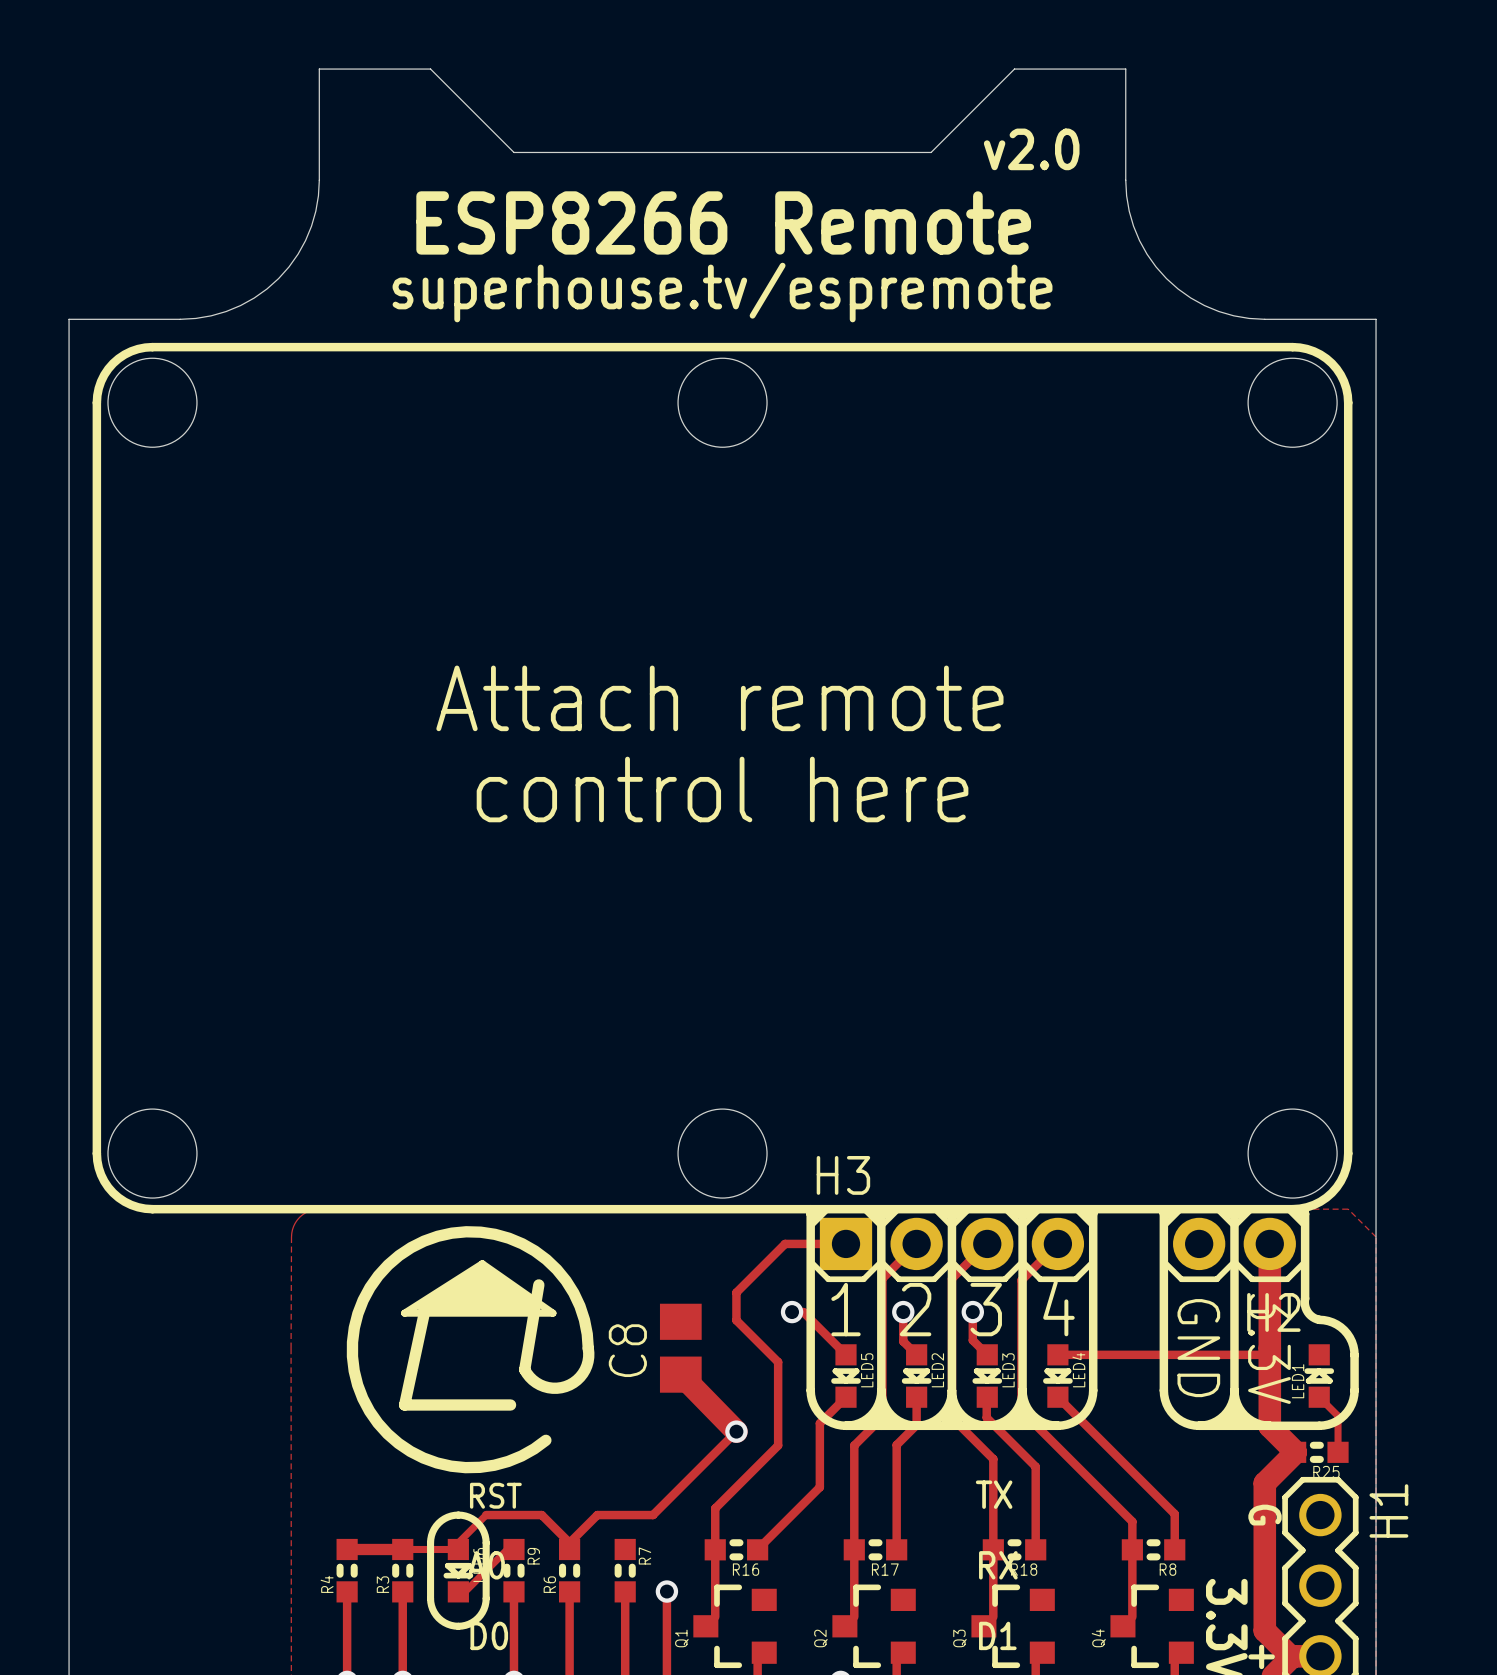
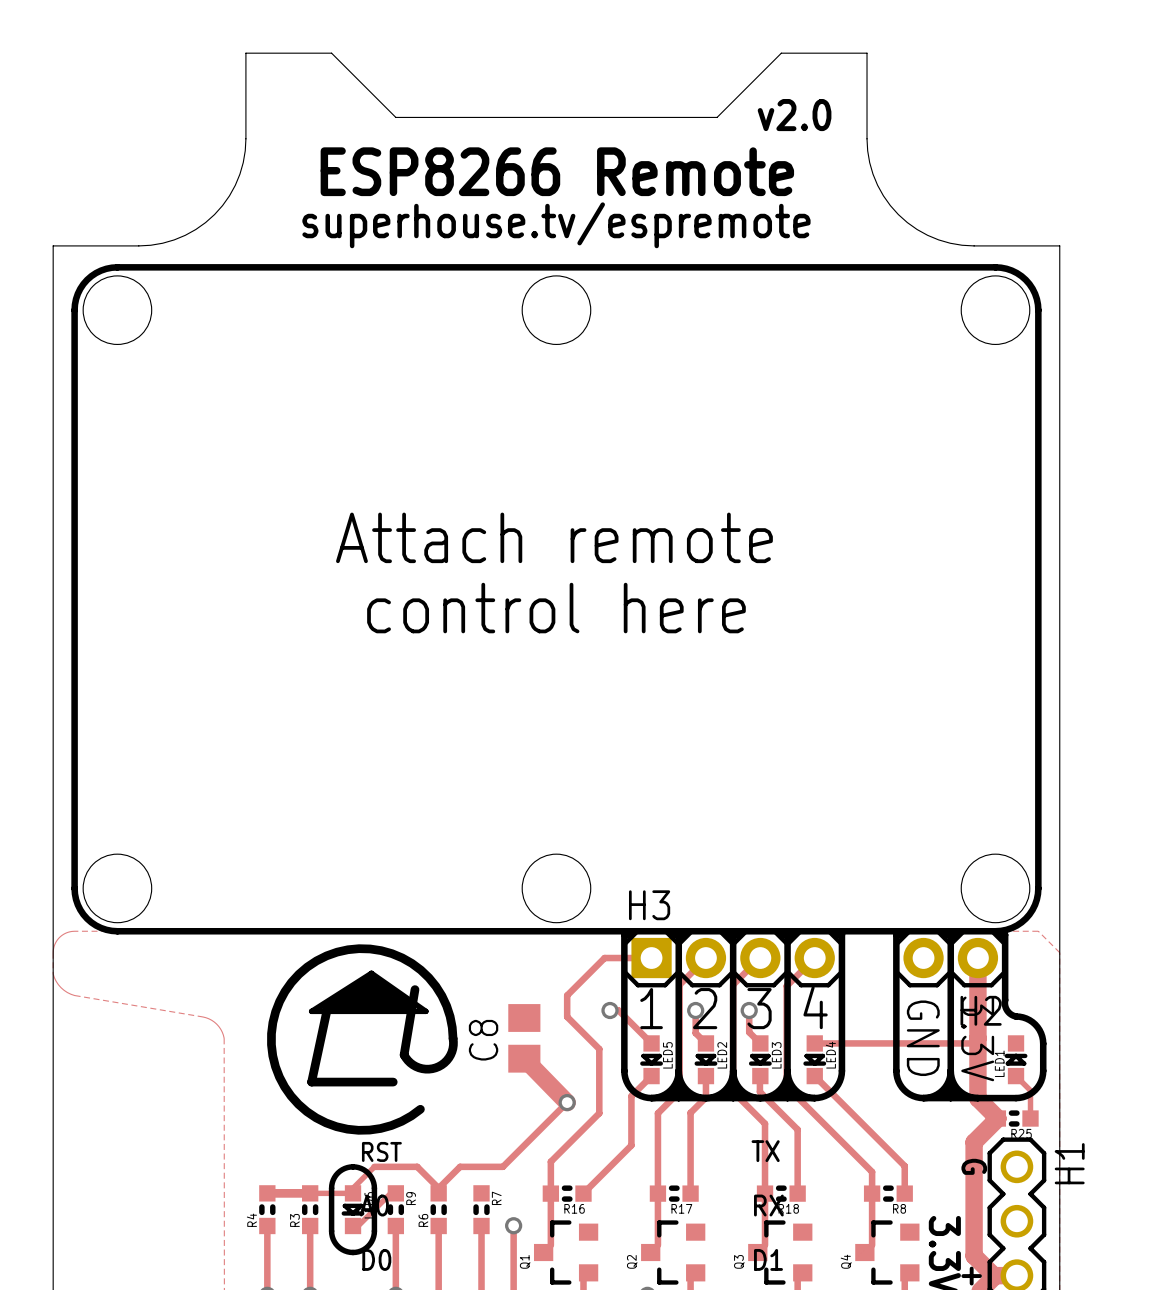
zone outline: (319, 1209) (302, 1214) (292, 1229) (291, 1348) -> (245, 931) (71, 931) (59, 937) (53, 947) (53, 974) (58, 984) (67, 992) (74, 995) (205, 1017) (218, 1026) (224, 1038)

